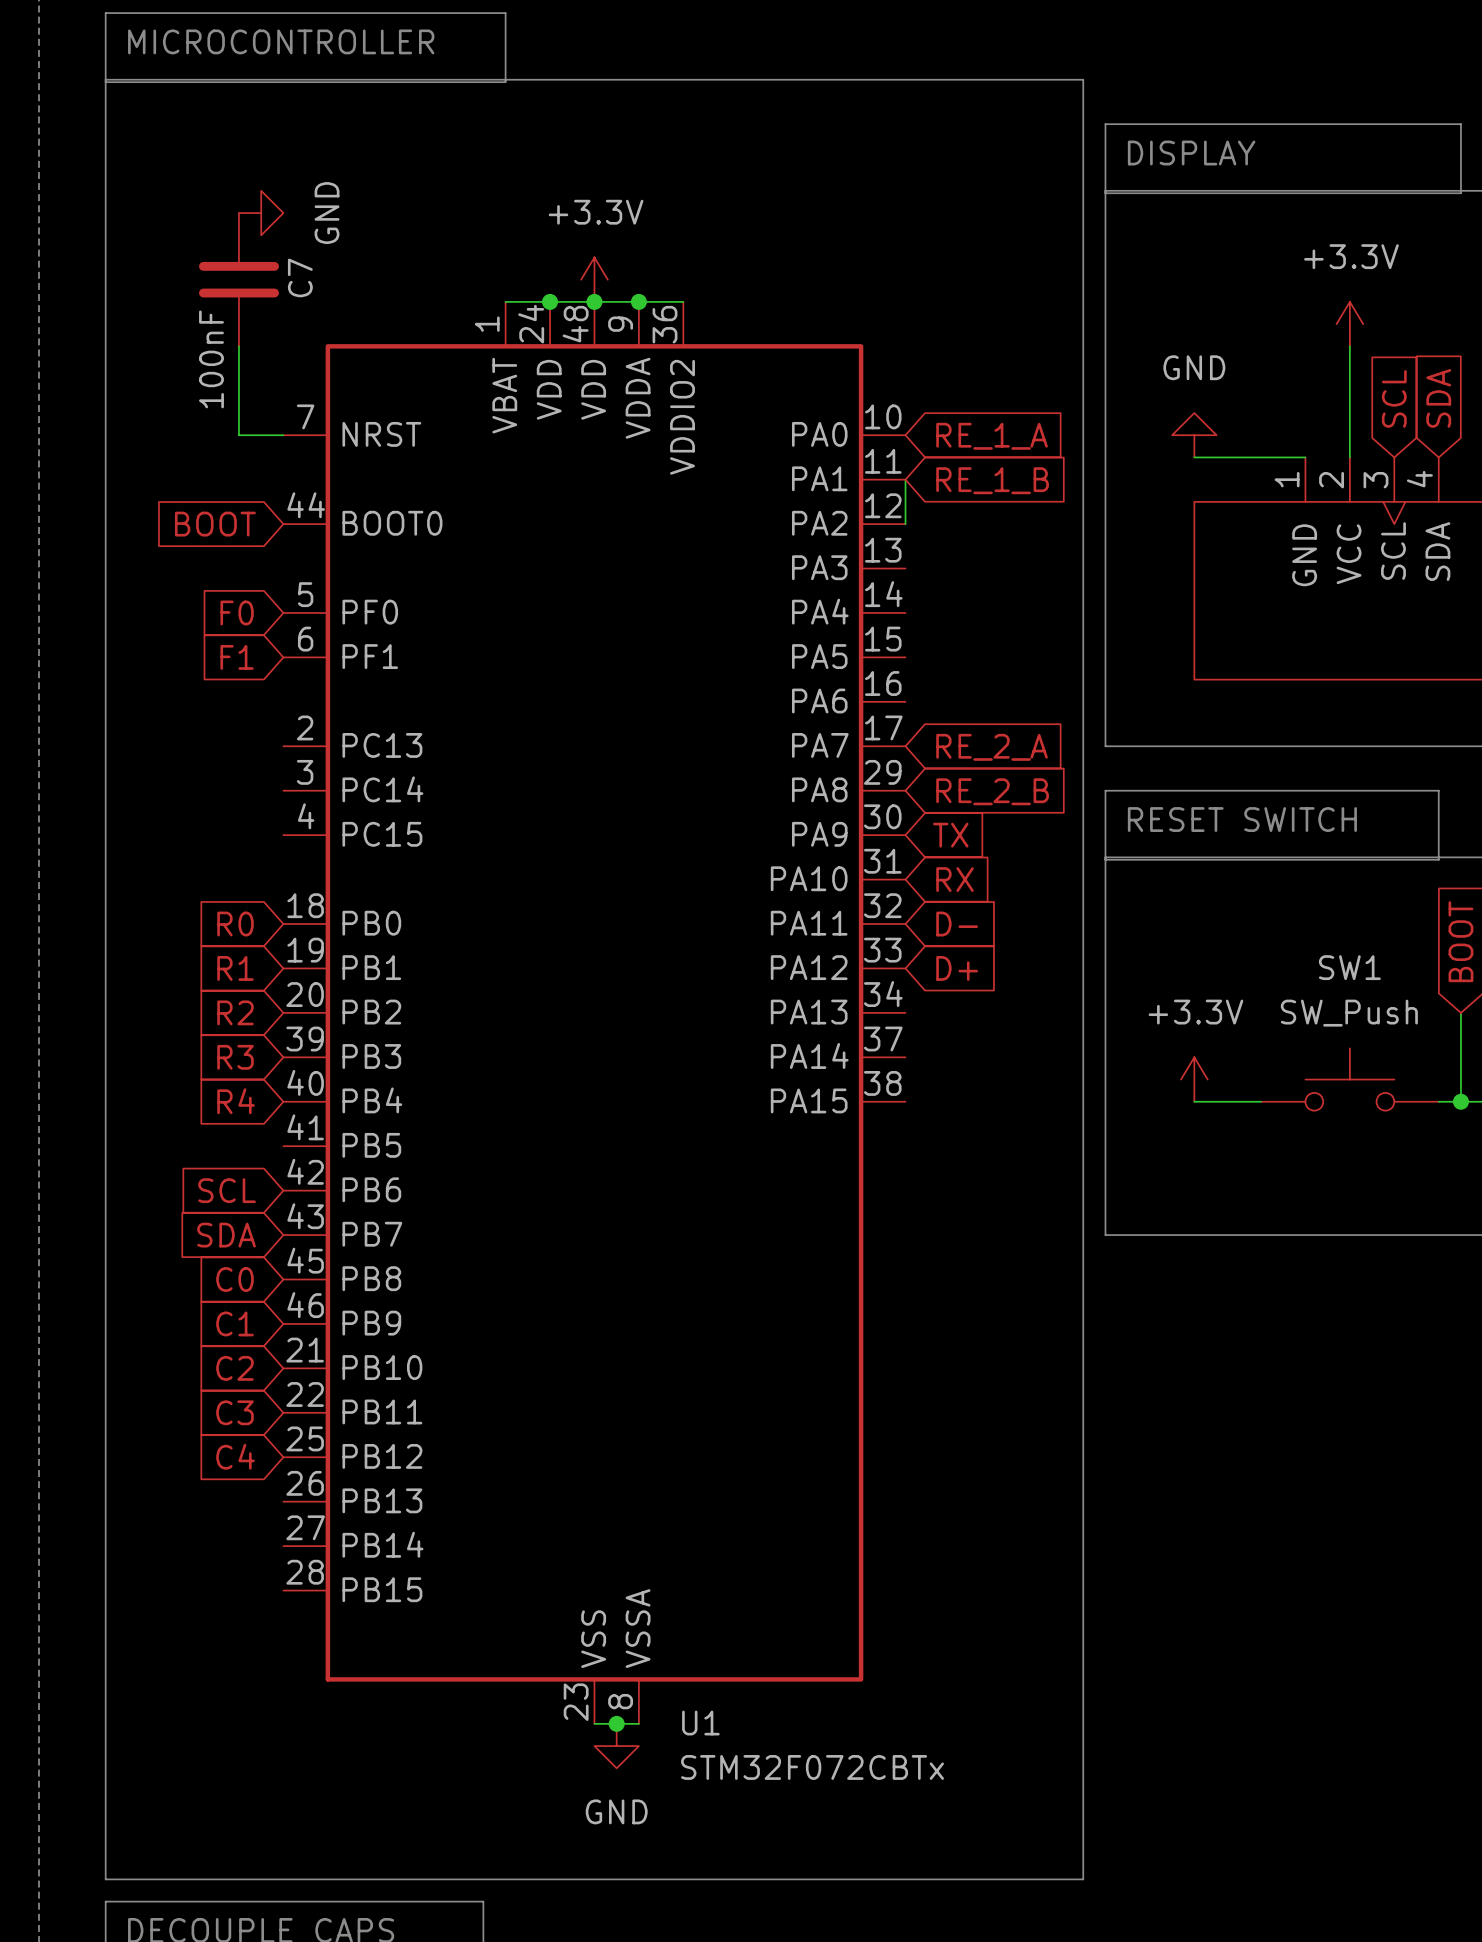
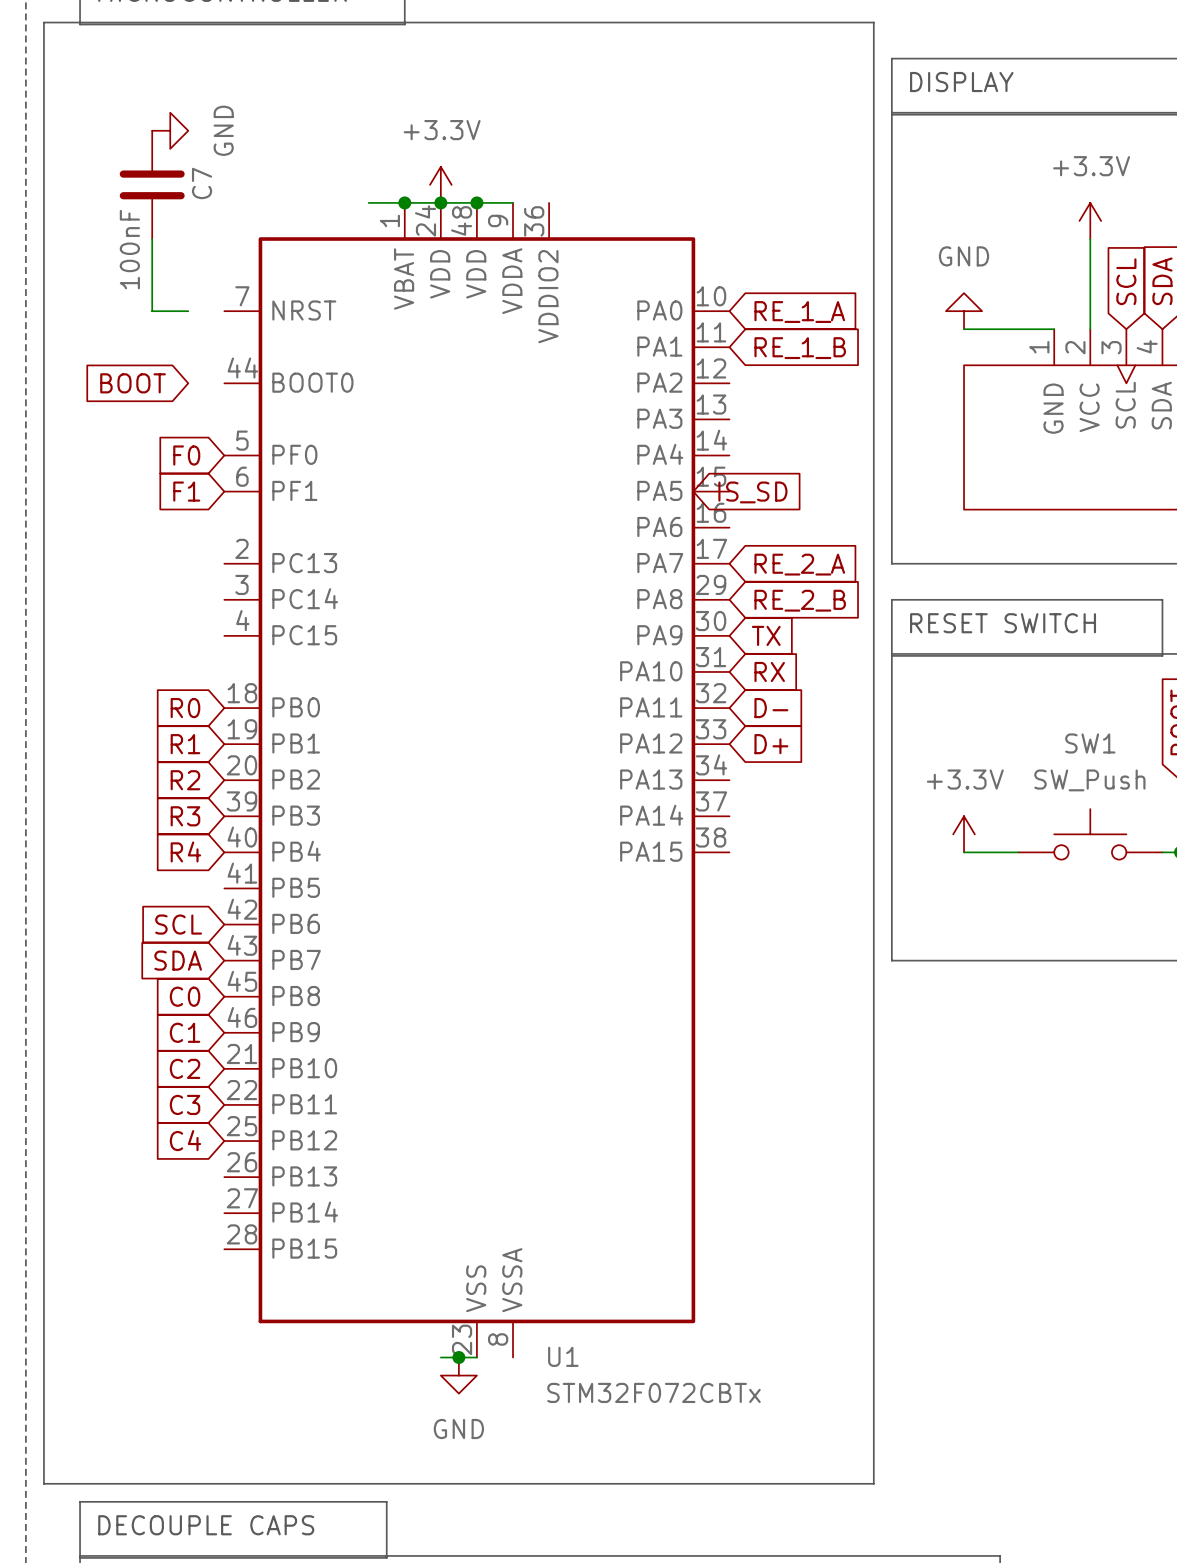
line: (105, 82) (105, 1879) -> (80, 22) (43, 22) (43, 1483) (80, 1483)
power symbol position: GND (261, 213) -> GND (170, 130)
C7 position: (238, 279) -> (152, 184)
power symbol position: +3.3V (594, 279) -> +3.3V (440, 184)
junction: none -> (404, 202)
wire: (638, 301) (683, 301) -> (368, 202) (404, 202)
junction: (638, 301) -> none
wire: (238, 346) (238, 435) (283, 435) -> (152, 239) (152, 311) (188, 311)
wire: (905, 479) (905, 524) -> none
global label position: BOOT (215, 524) -> BOOT (133, 383)
global label: none -> IS_SD (752, 492)
wire: (594, 1723) (638, 1723) -> (476, 1357) (440, 1357)
junction position: (616, 1723) -> (458, 1357)
power symbol position: GND (616, 1746) -> GND (458, 1375)

